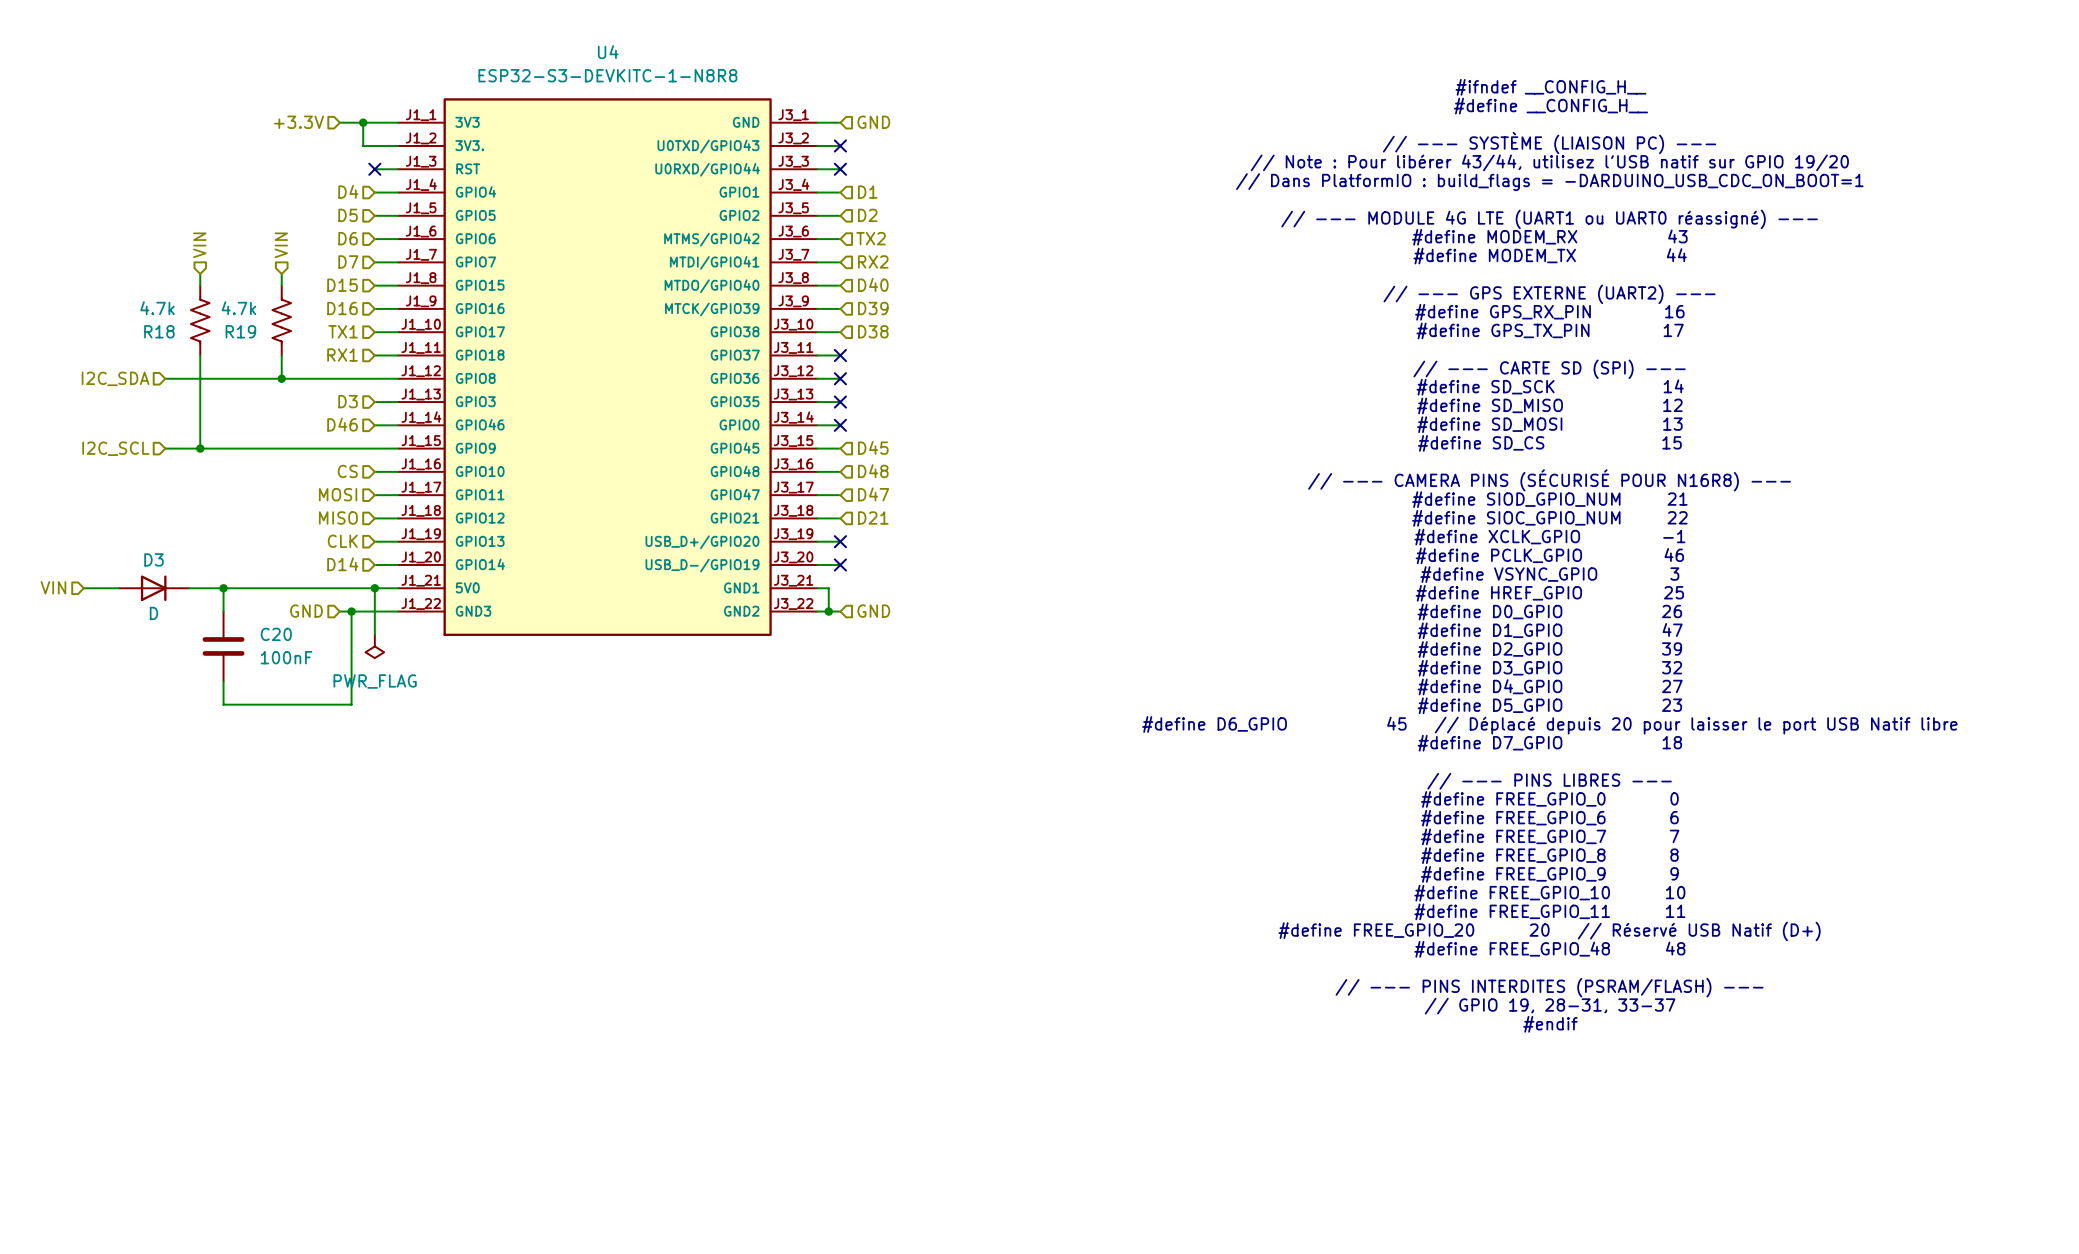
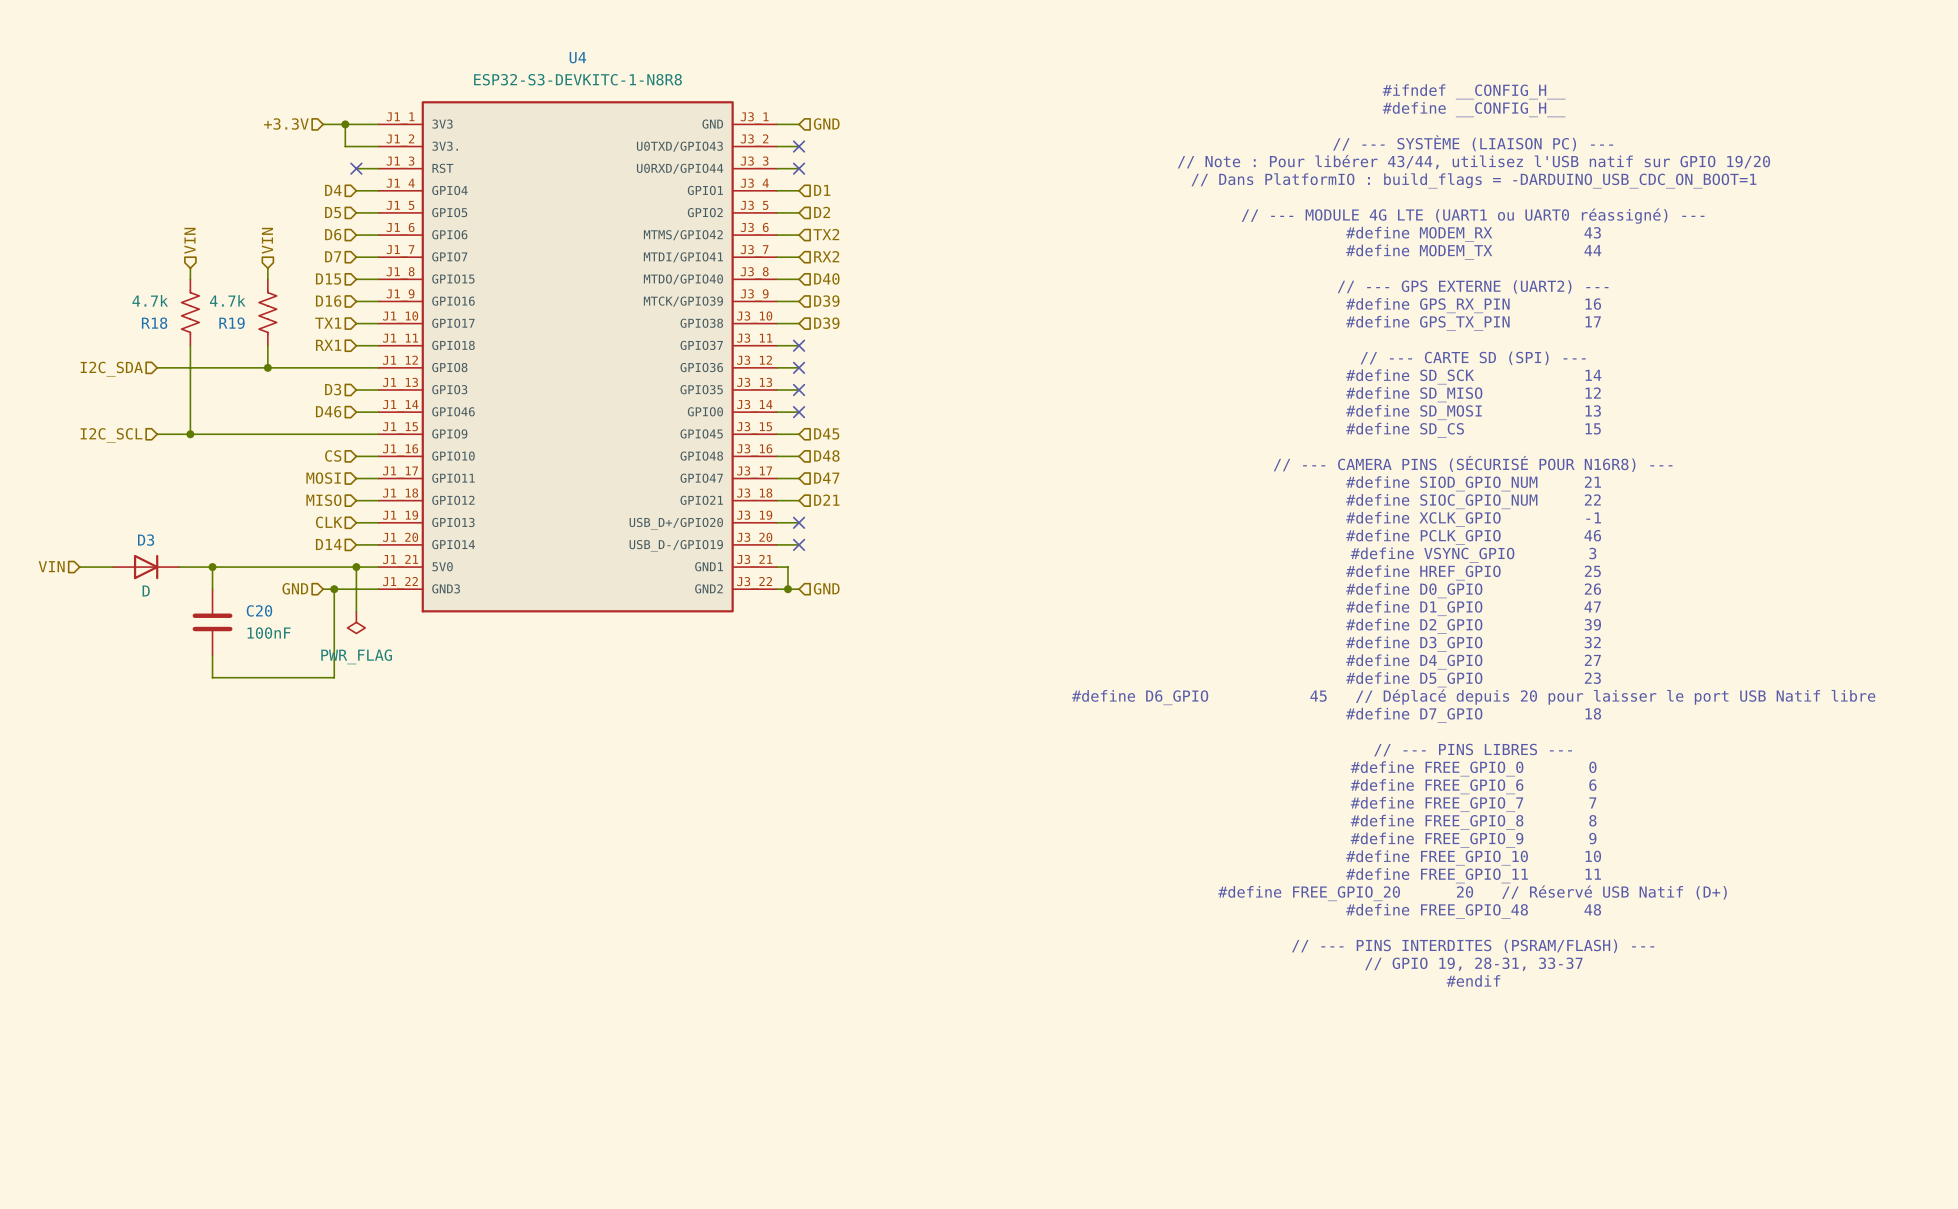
hierarchical label: D38 (873, 331) -> D39 (826, 323)

